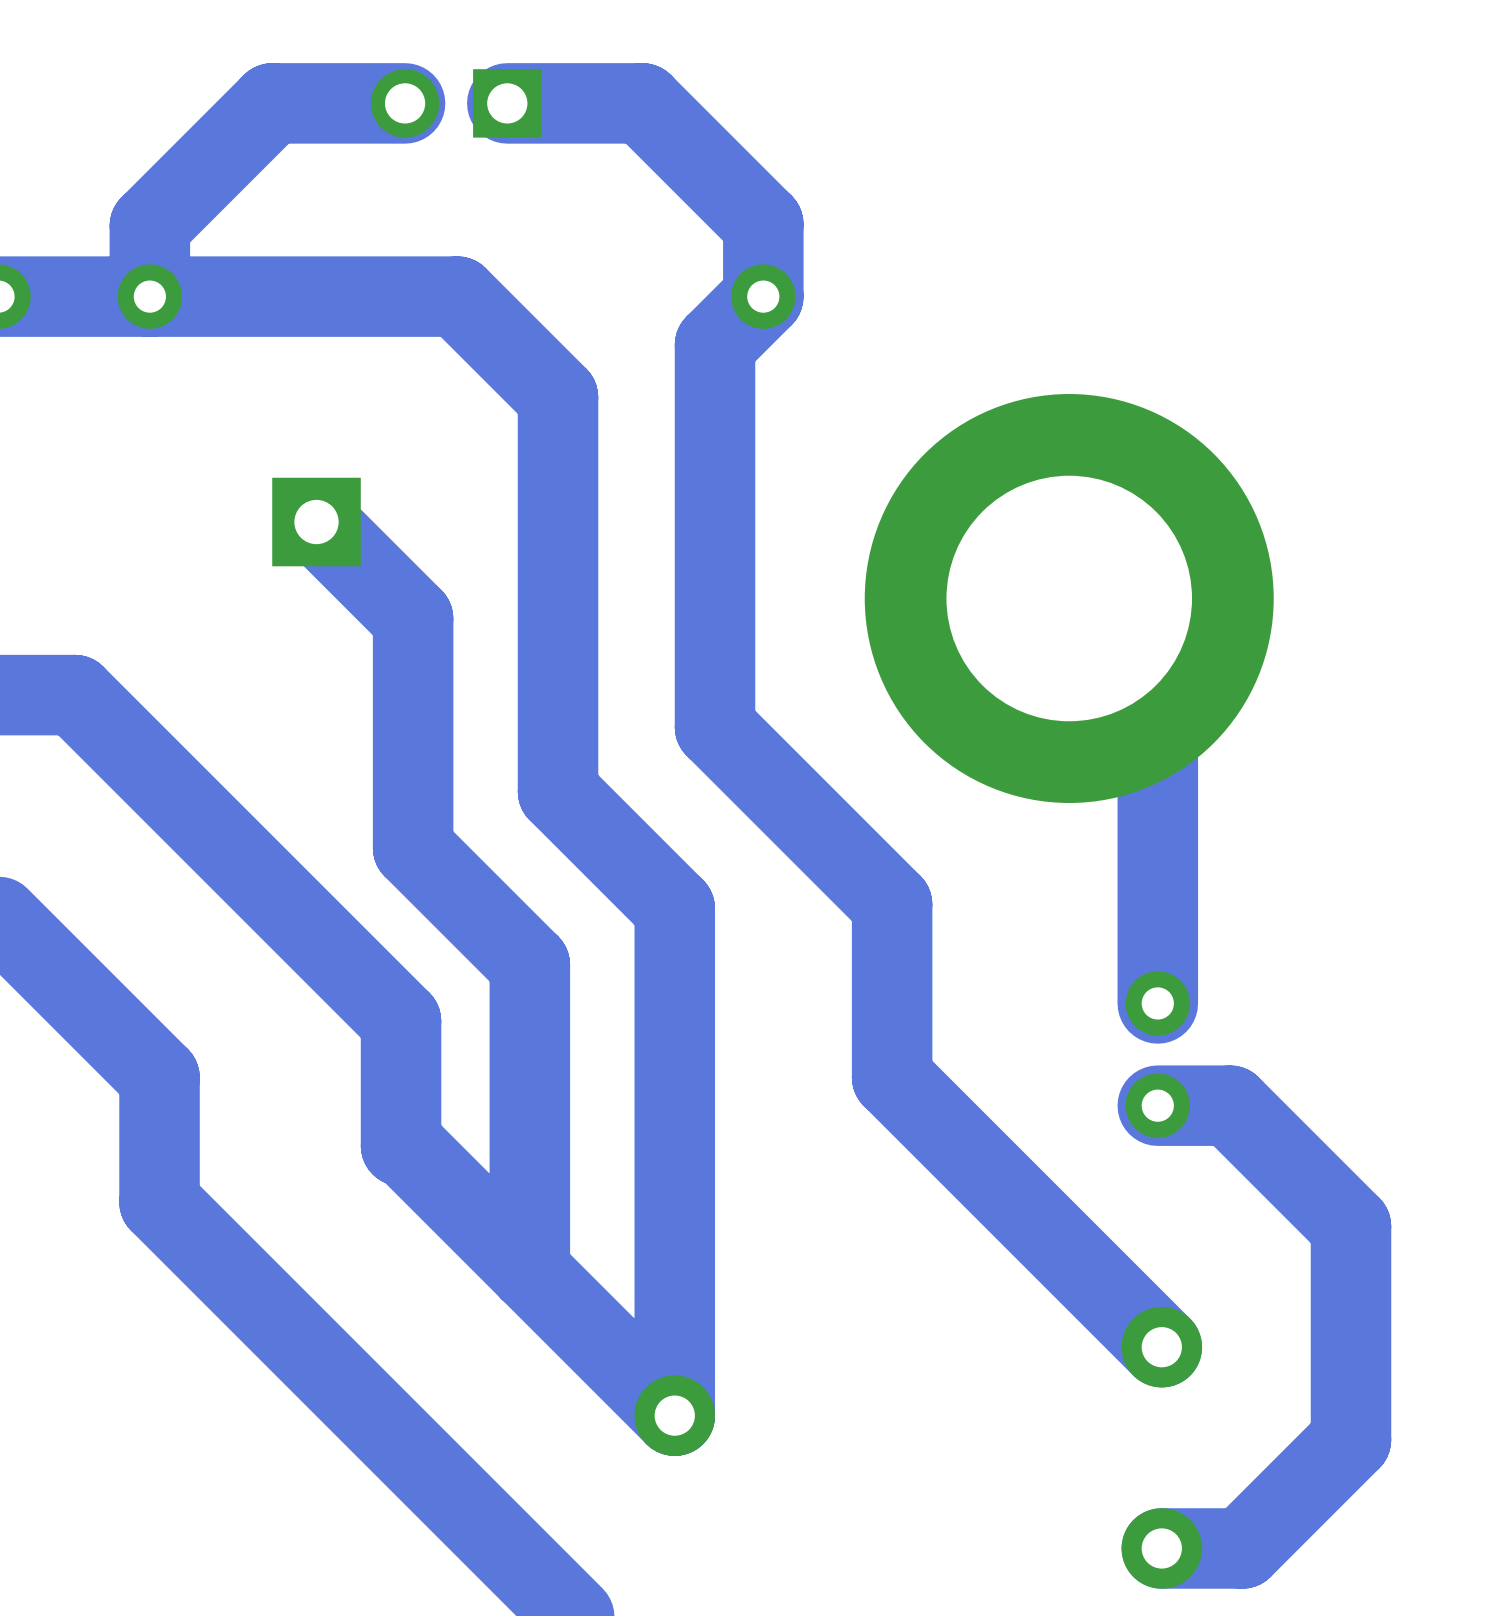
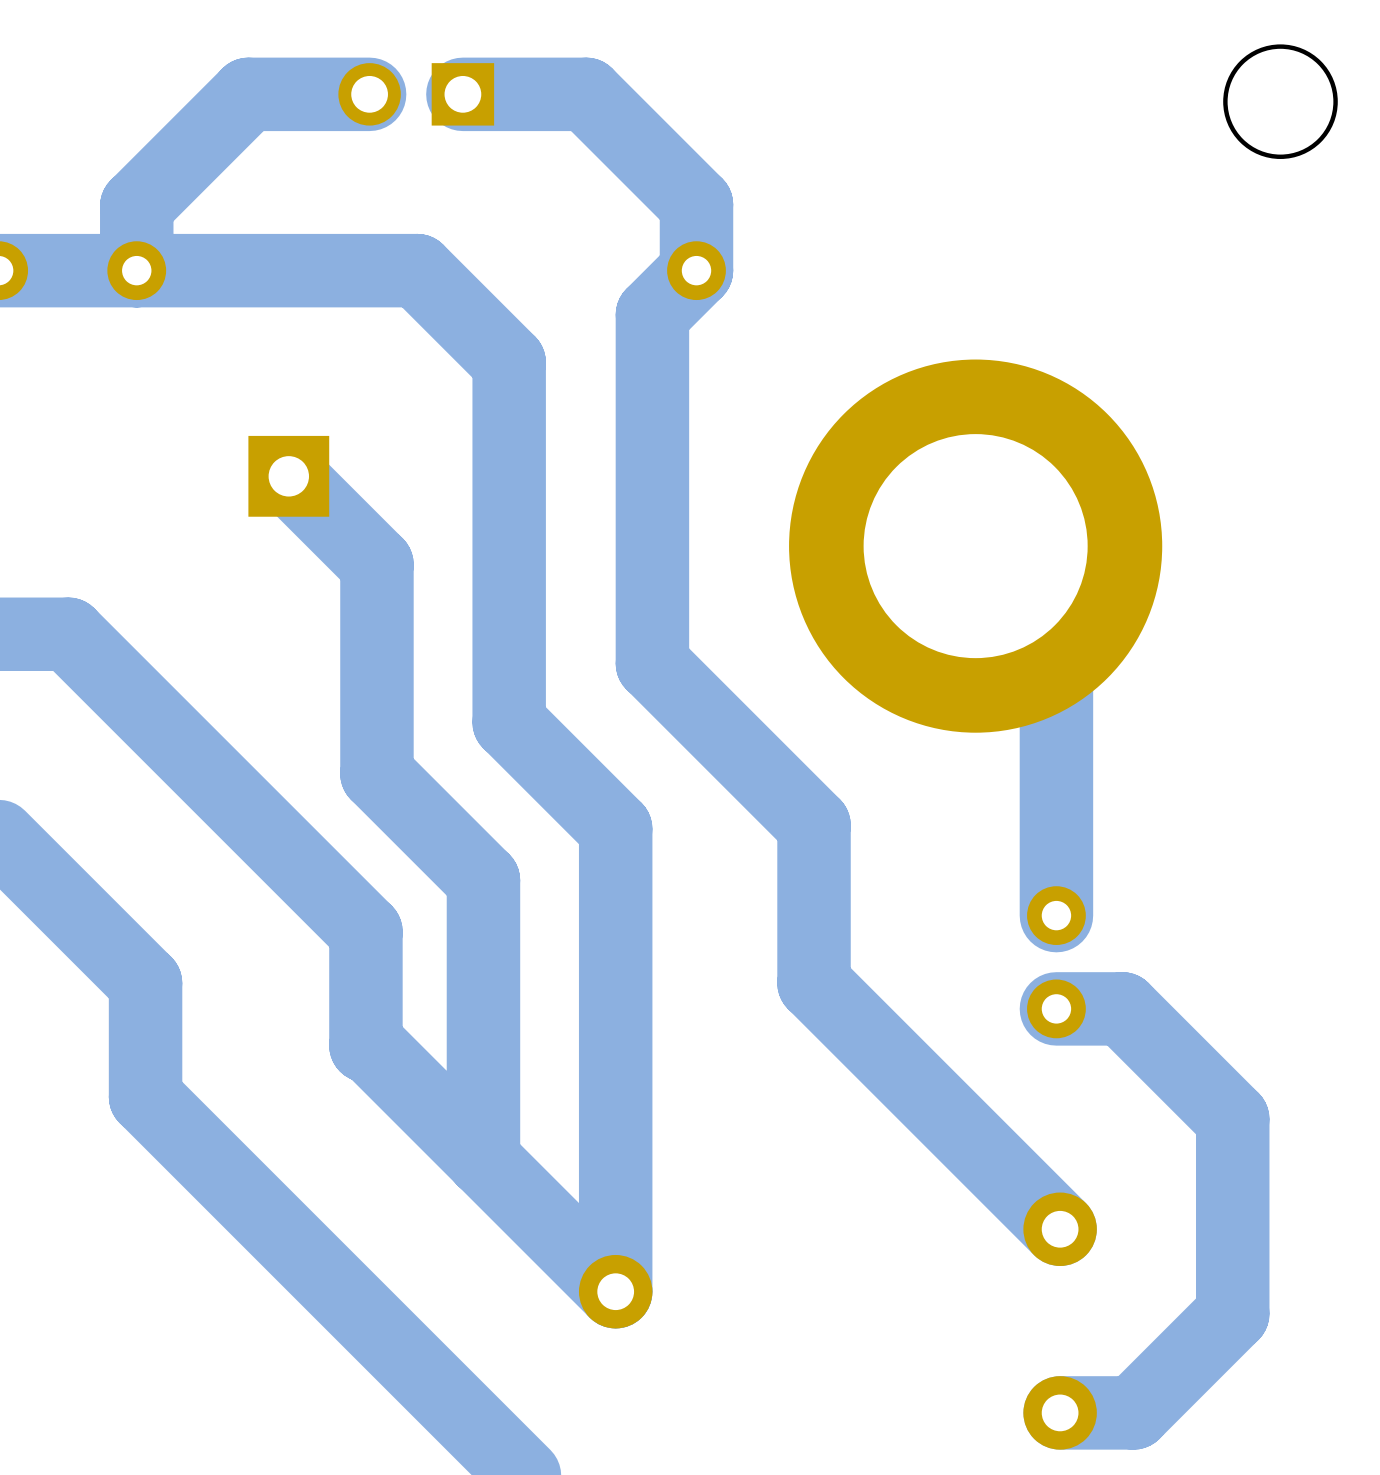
round board edge: none -> [1223, 44, 1338, 159]

